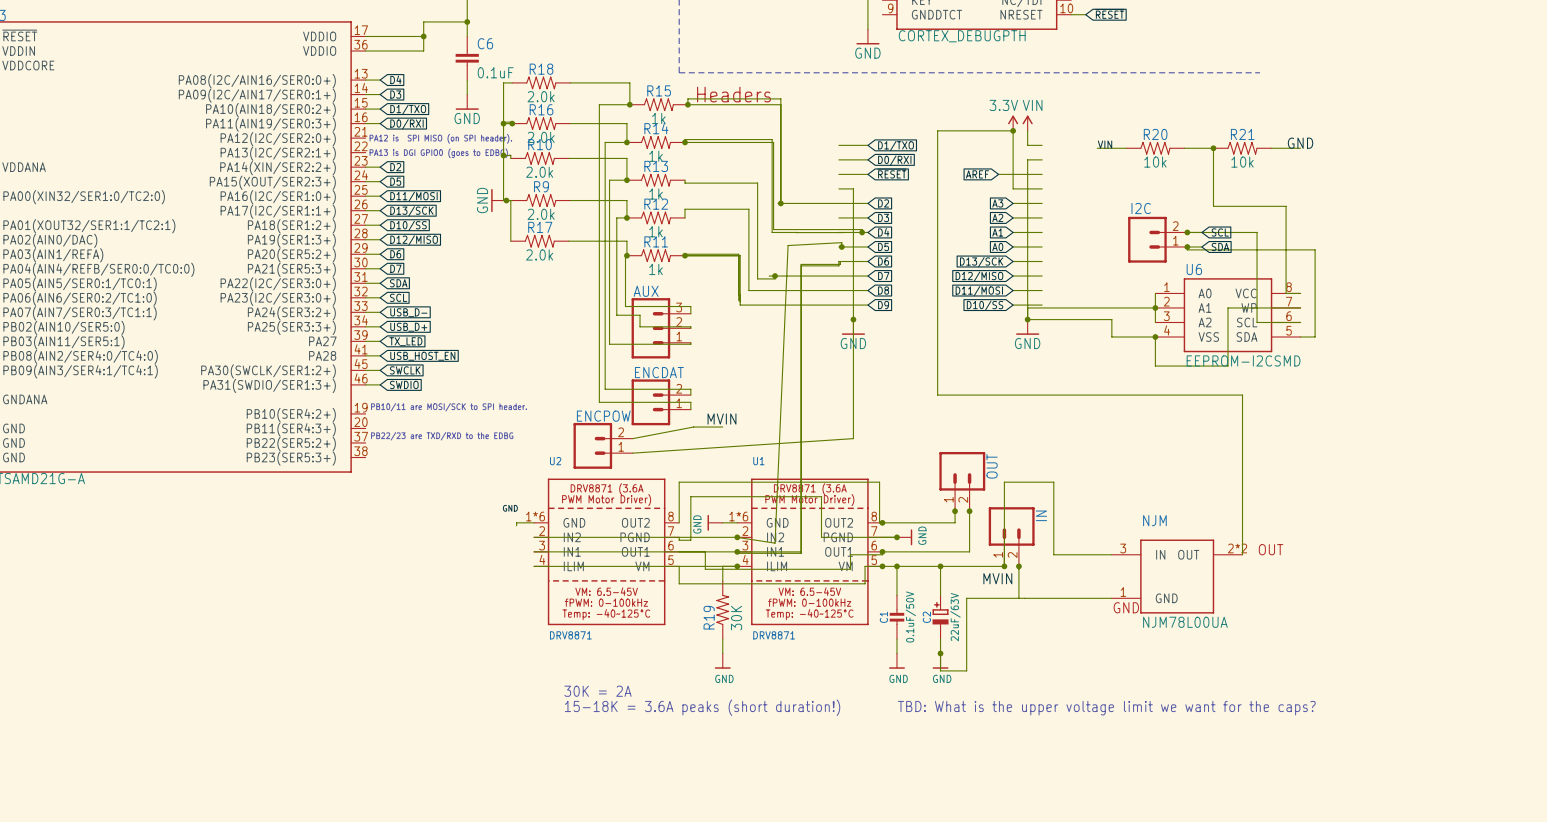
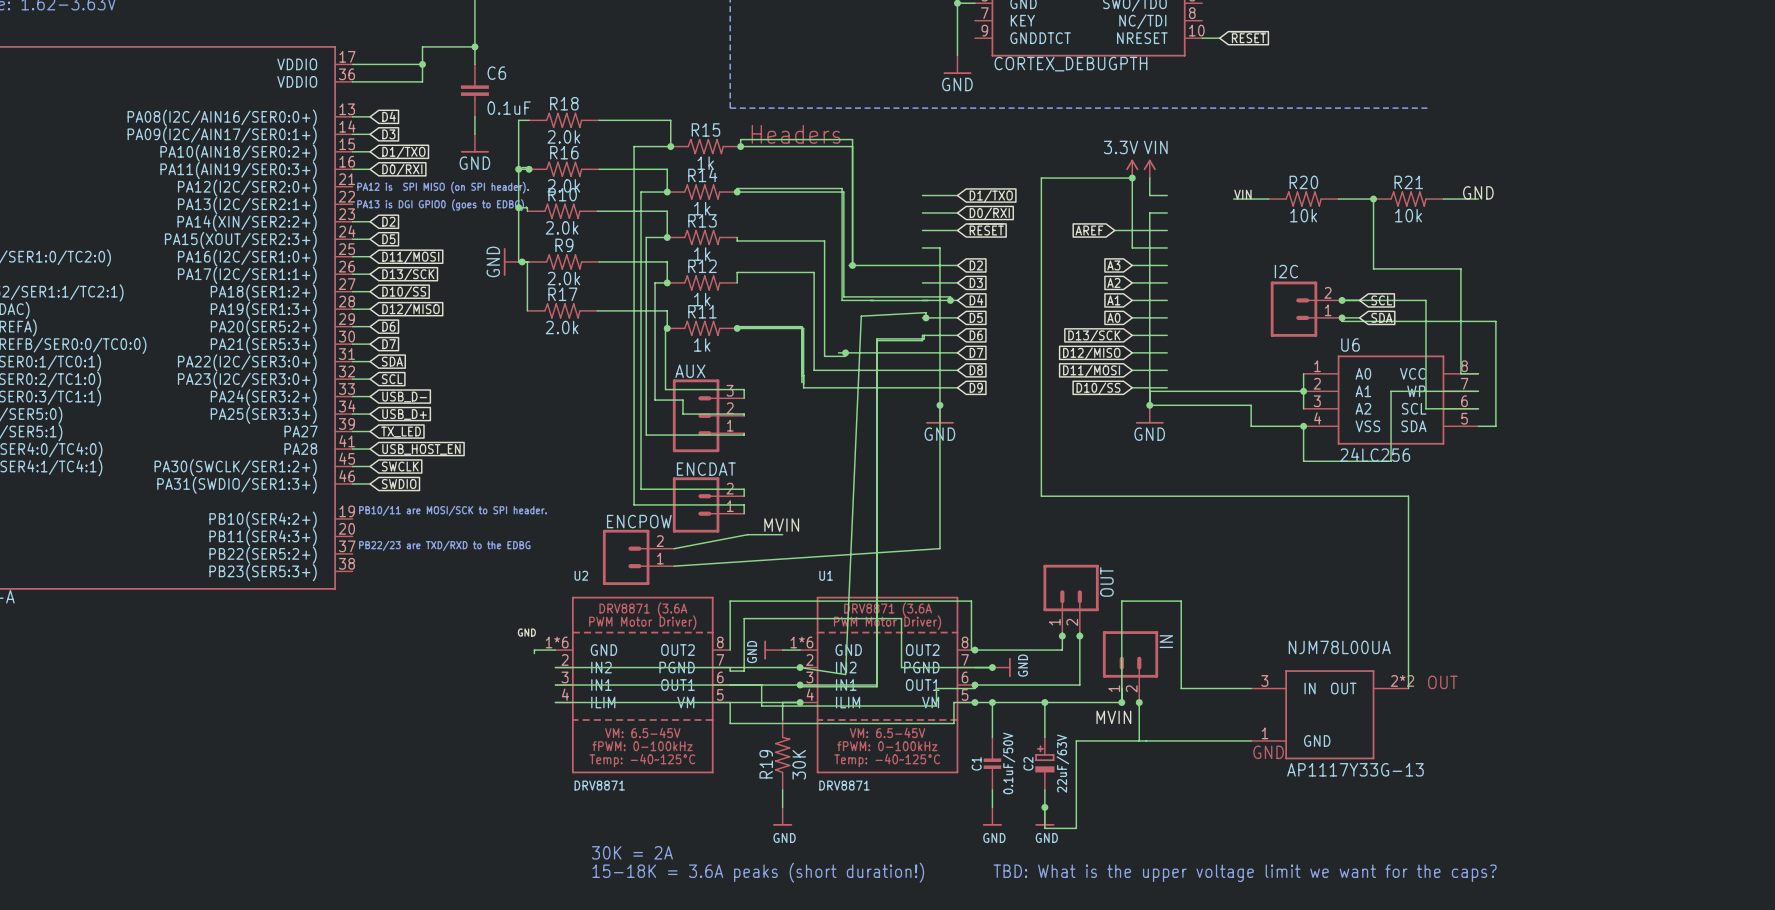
U6 value: EEPROM-I2CSMD (1243, 360) -> 24LC256 (1375, 454)
NJM name: NJM (1154, 520) -> NJM78L00UA (1339, 647)
NJM value: NJM78L00UA (1185, 622) -> AP1117Y33G-13 (1355, 769)

